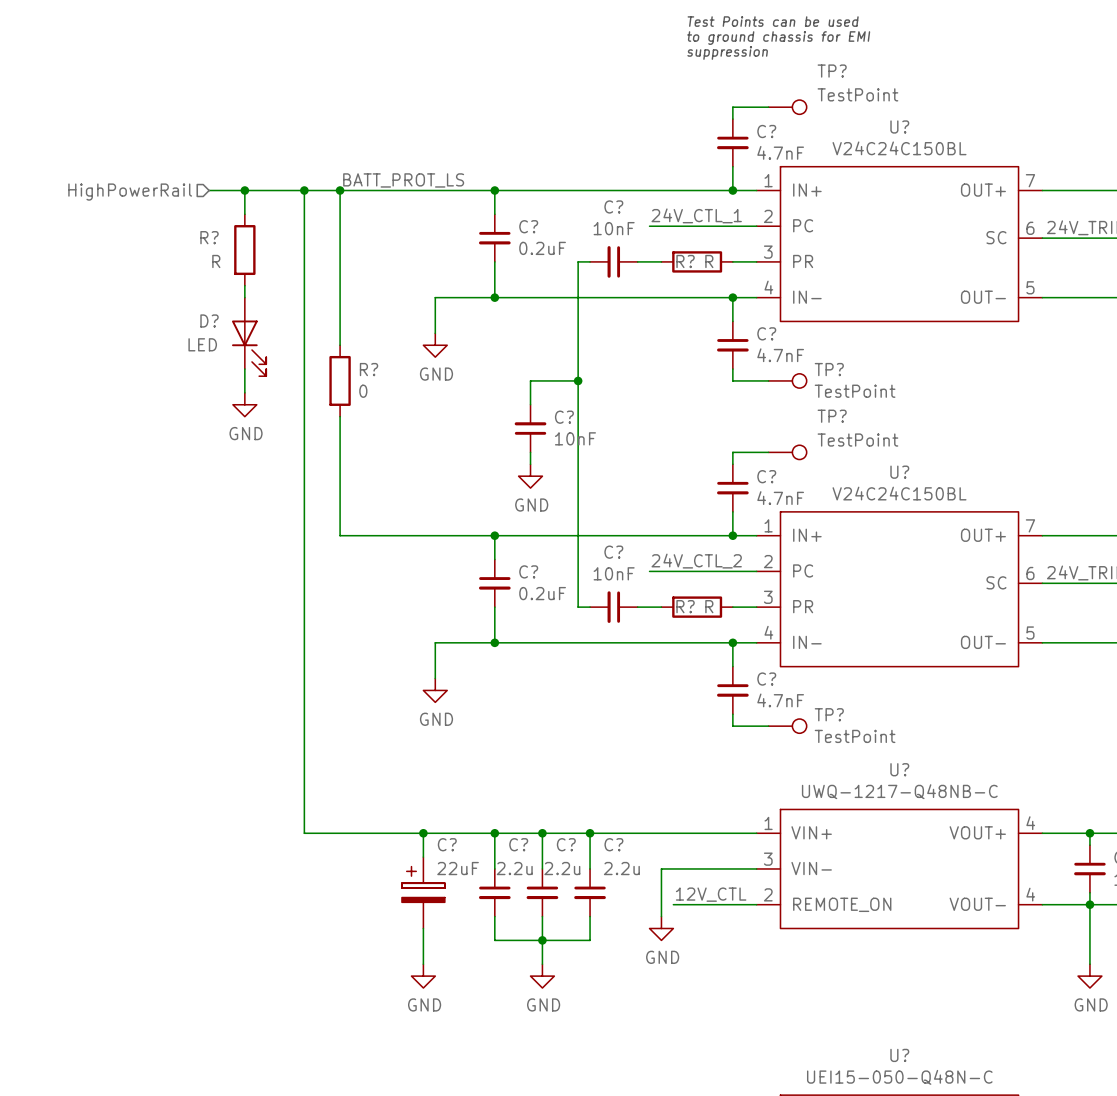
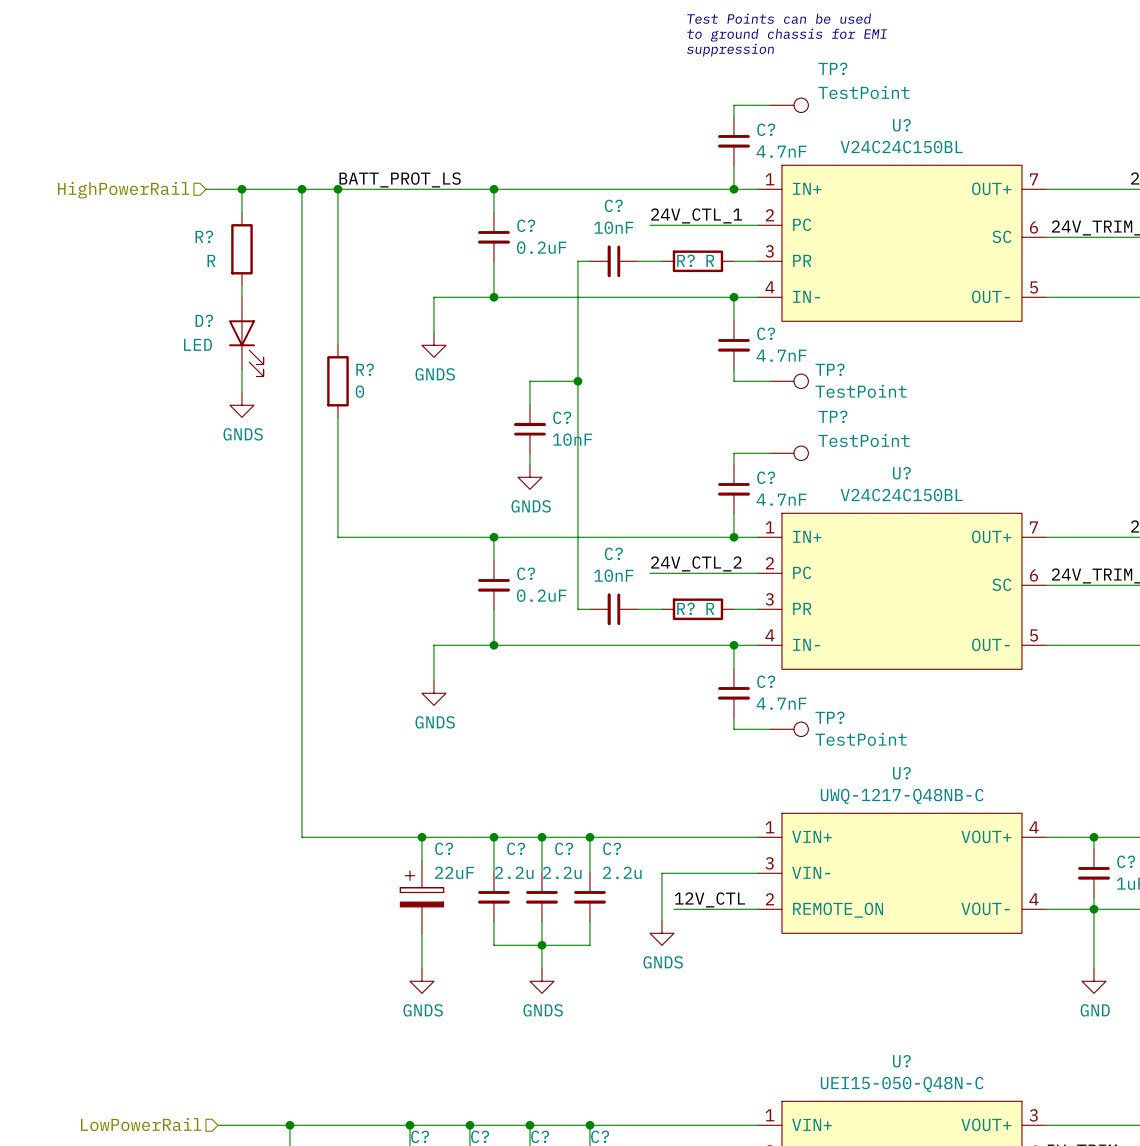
power symbol: GND (435, 345) -> GNDS (433, 345)
power symbol: GND (244, 404) -> GNDS (241, 405)
power symbol: GND (530, 476) -> GNDS (529, 477)
power symbol: GND (435, 690) -> GNDS (433, 693)
power symbol: GND (661, 928) -> GNDS (661, 933)
power symbol: GND (423, 976) -> GNDS (421, 981)
power symbol: GND (542, 976) -> GNDS (541, 981)

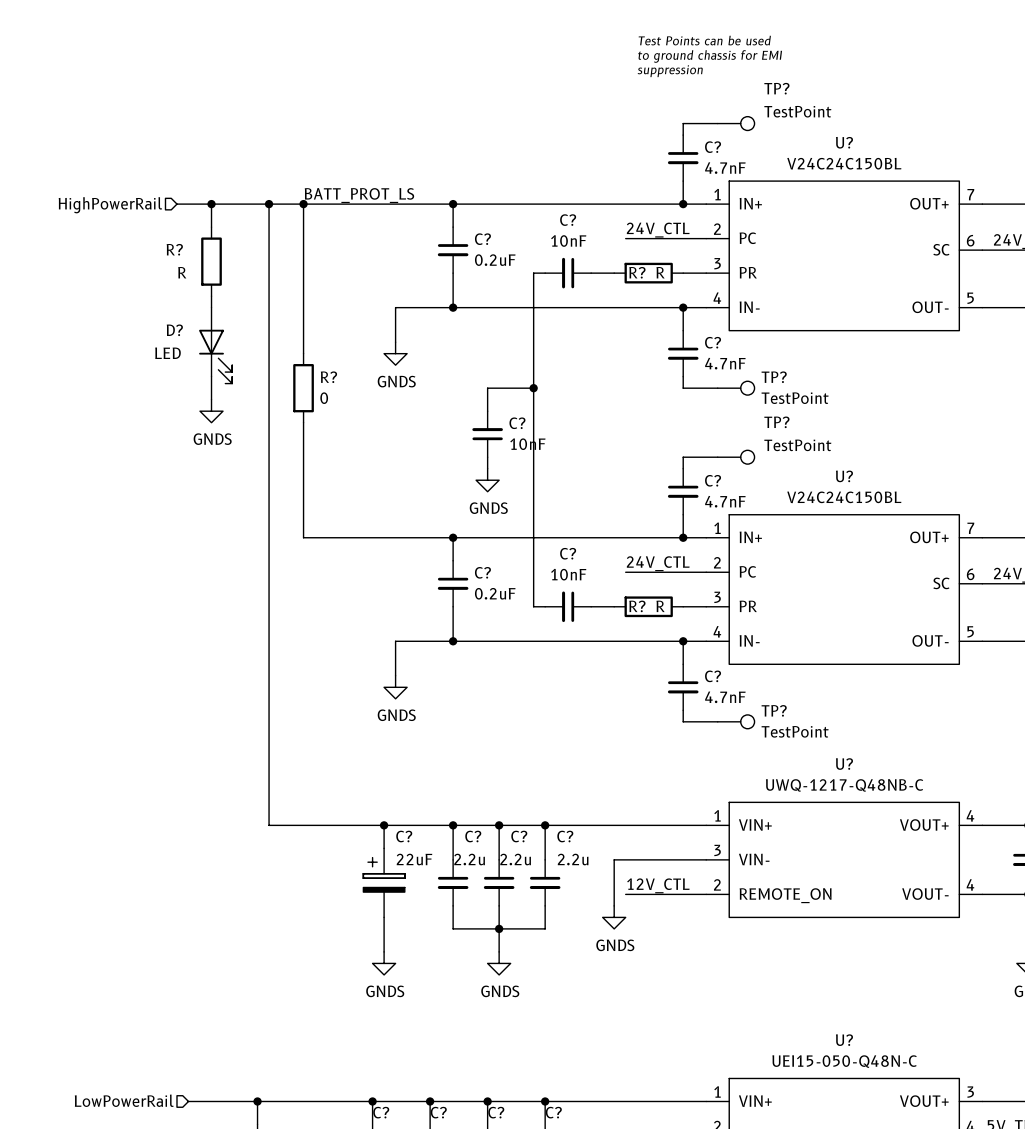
label: 24V_CTL_1 (696, 215) -> 24V_CTL (658, 230)
wire: (649, 225) (673, 225) -> none
label: 24V_CTL_2 (696, 563) -> 24V_CTL (658, 563)
wire: (649, 573) (673, 573) -> none

